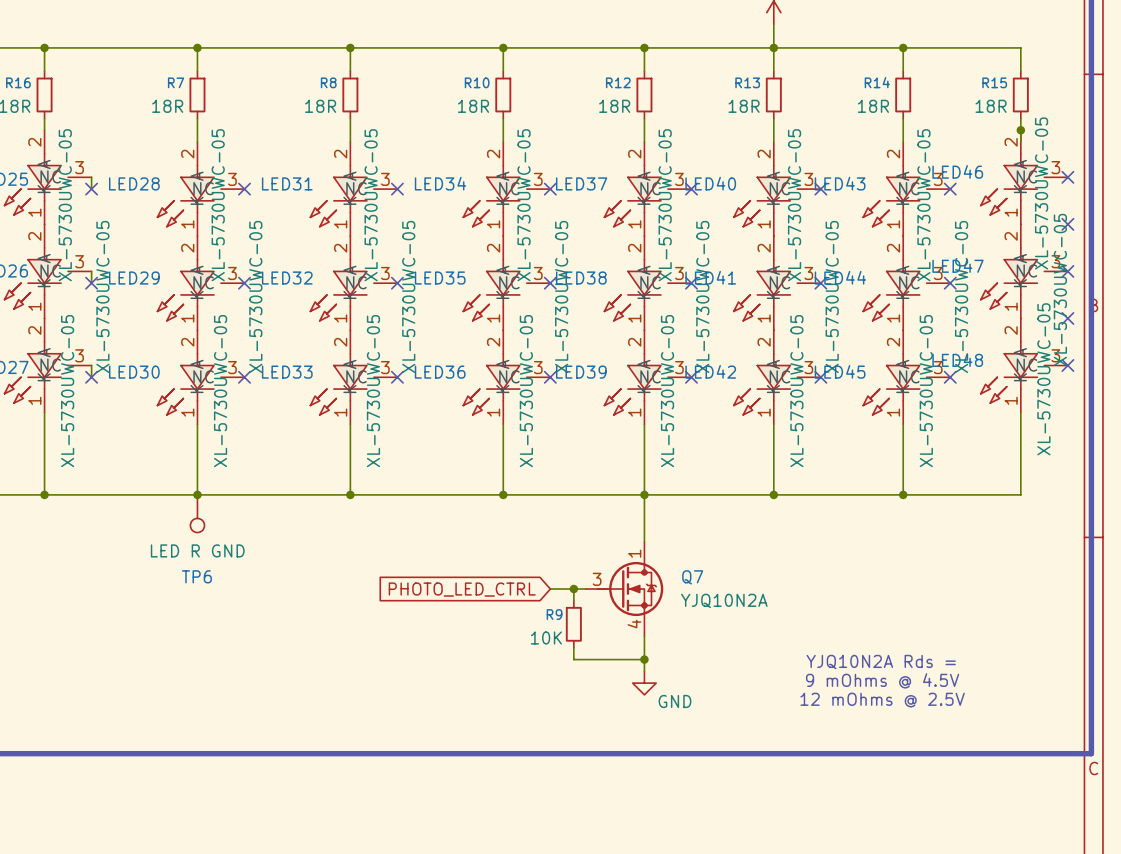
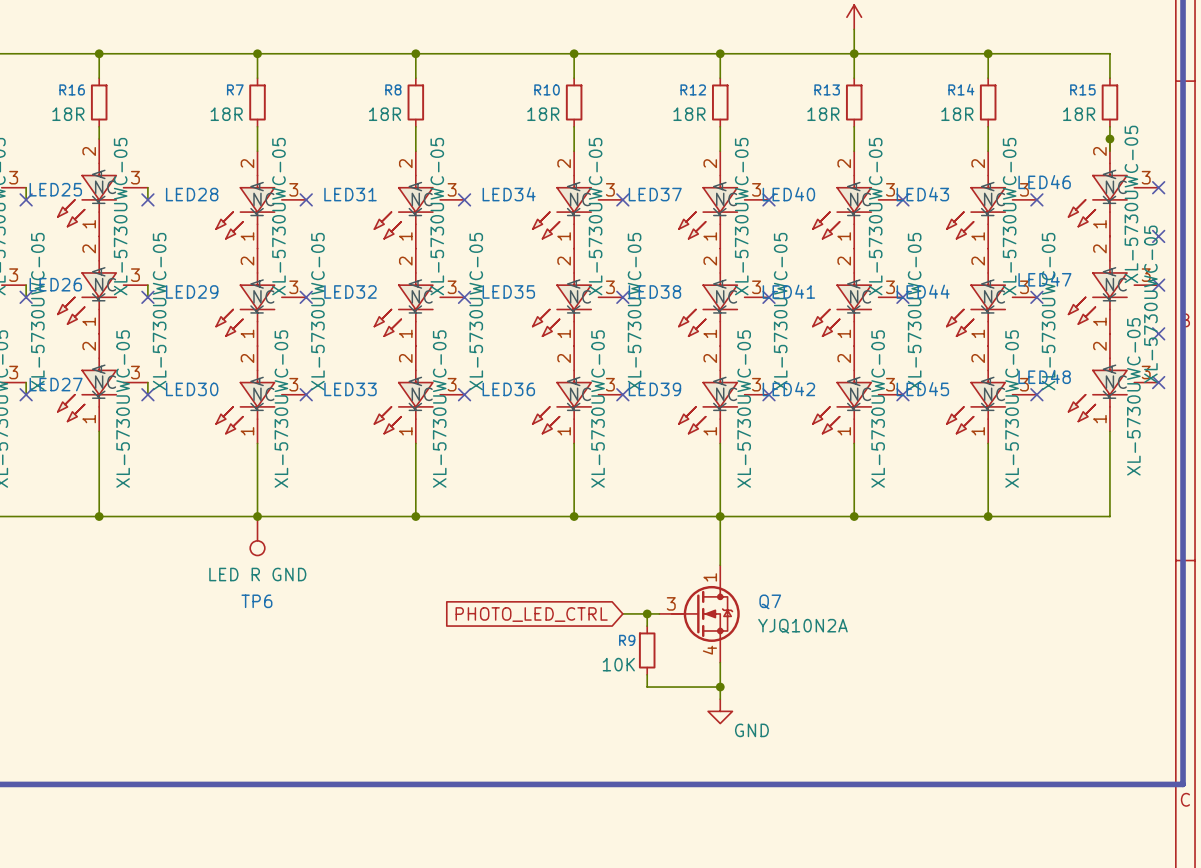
text: YJQ10N2A Rds = (881, 661) -> none
text: 9 mOhms @ 4.5V (882, 680) -> none
text: 12 mOhms @ 2.5V (882, 700) -> none

